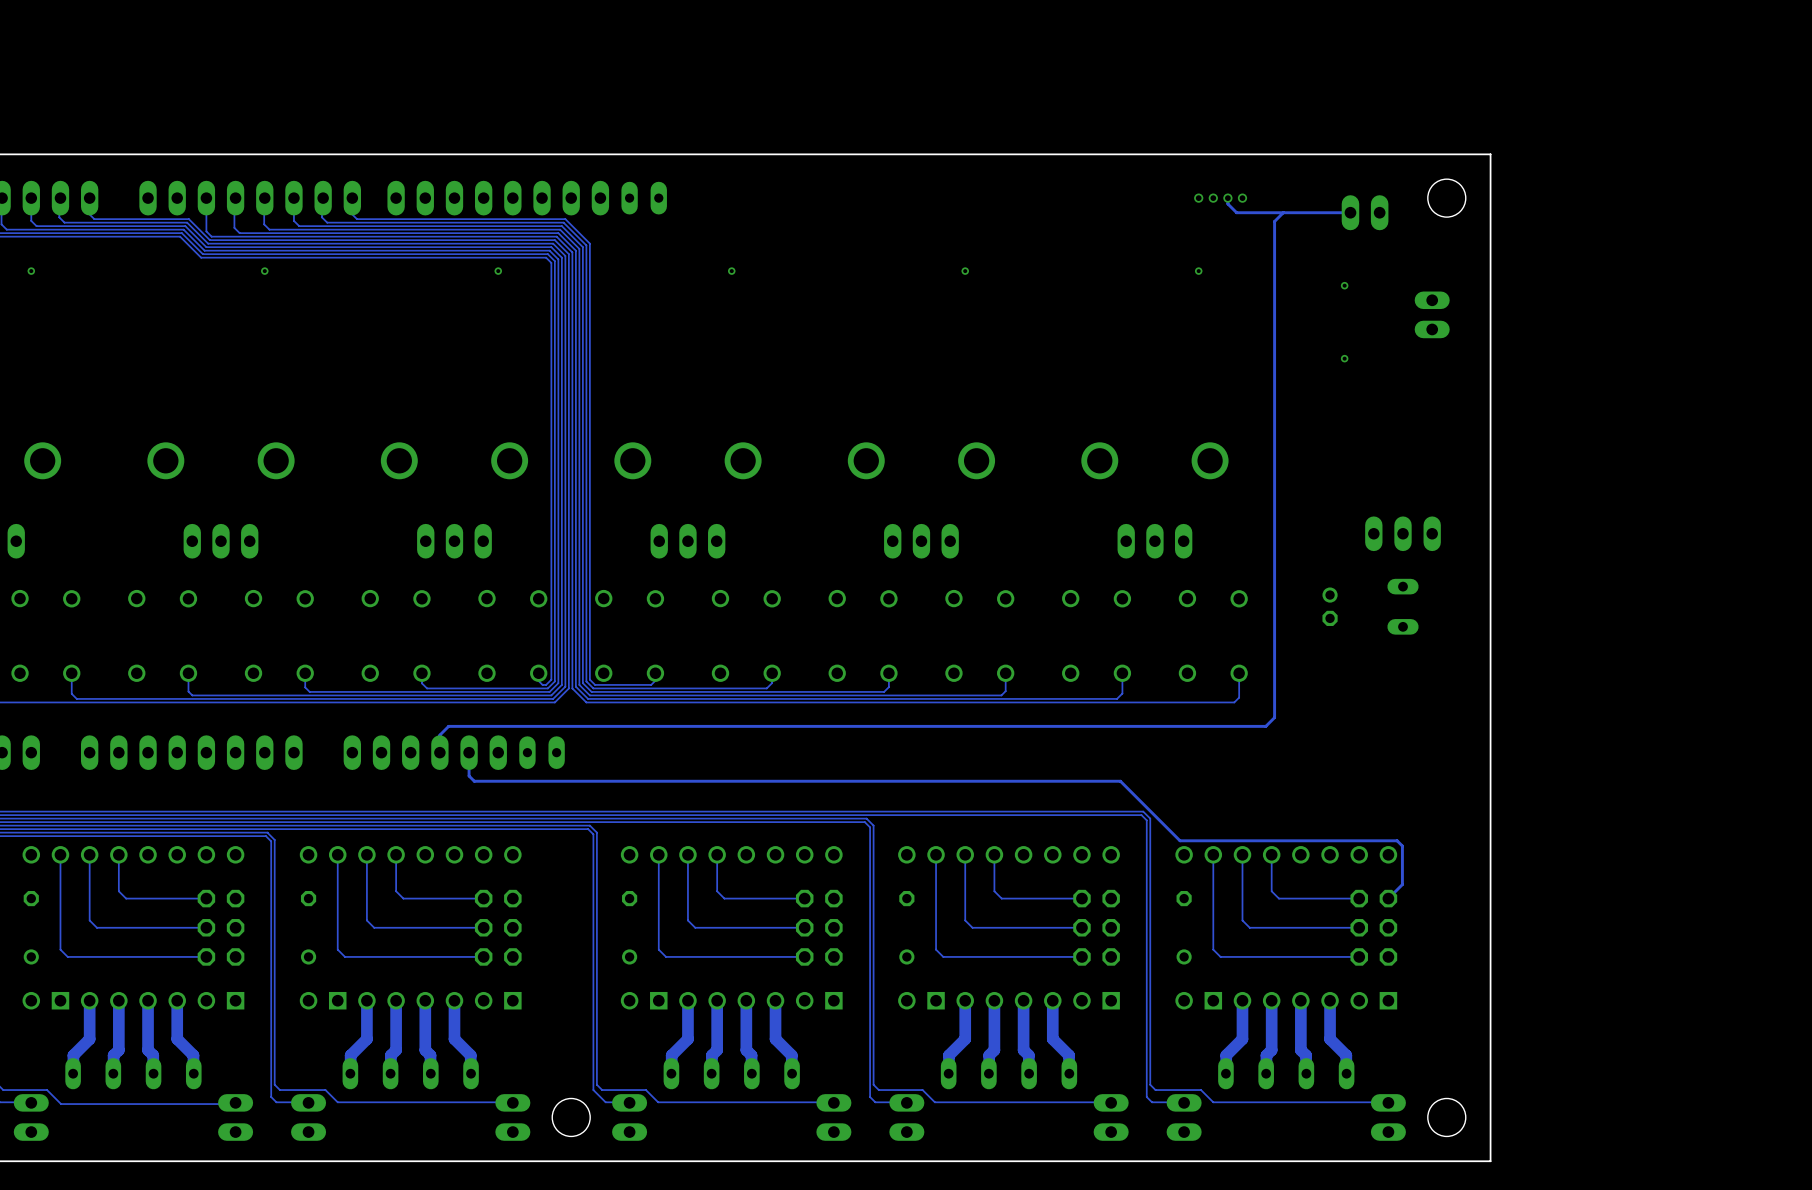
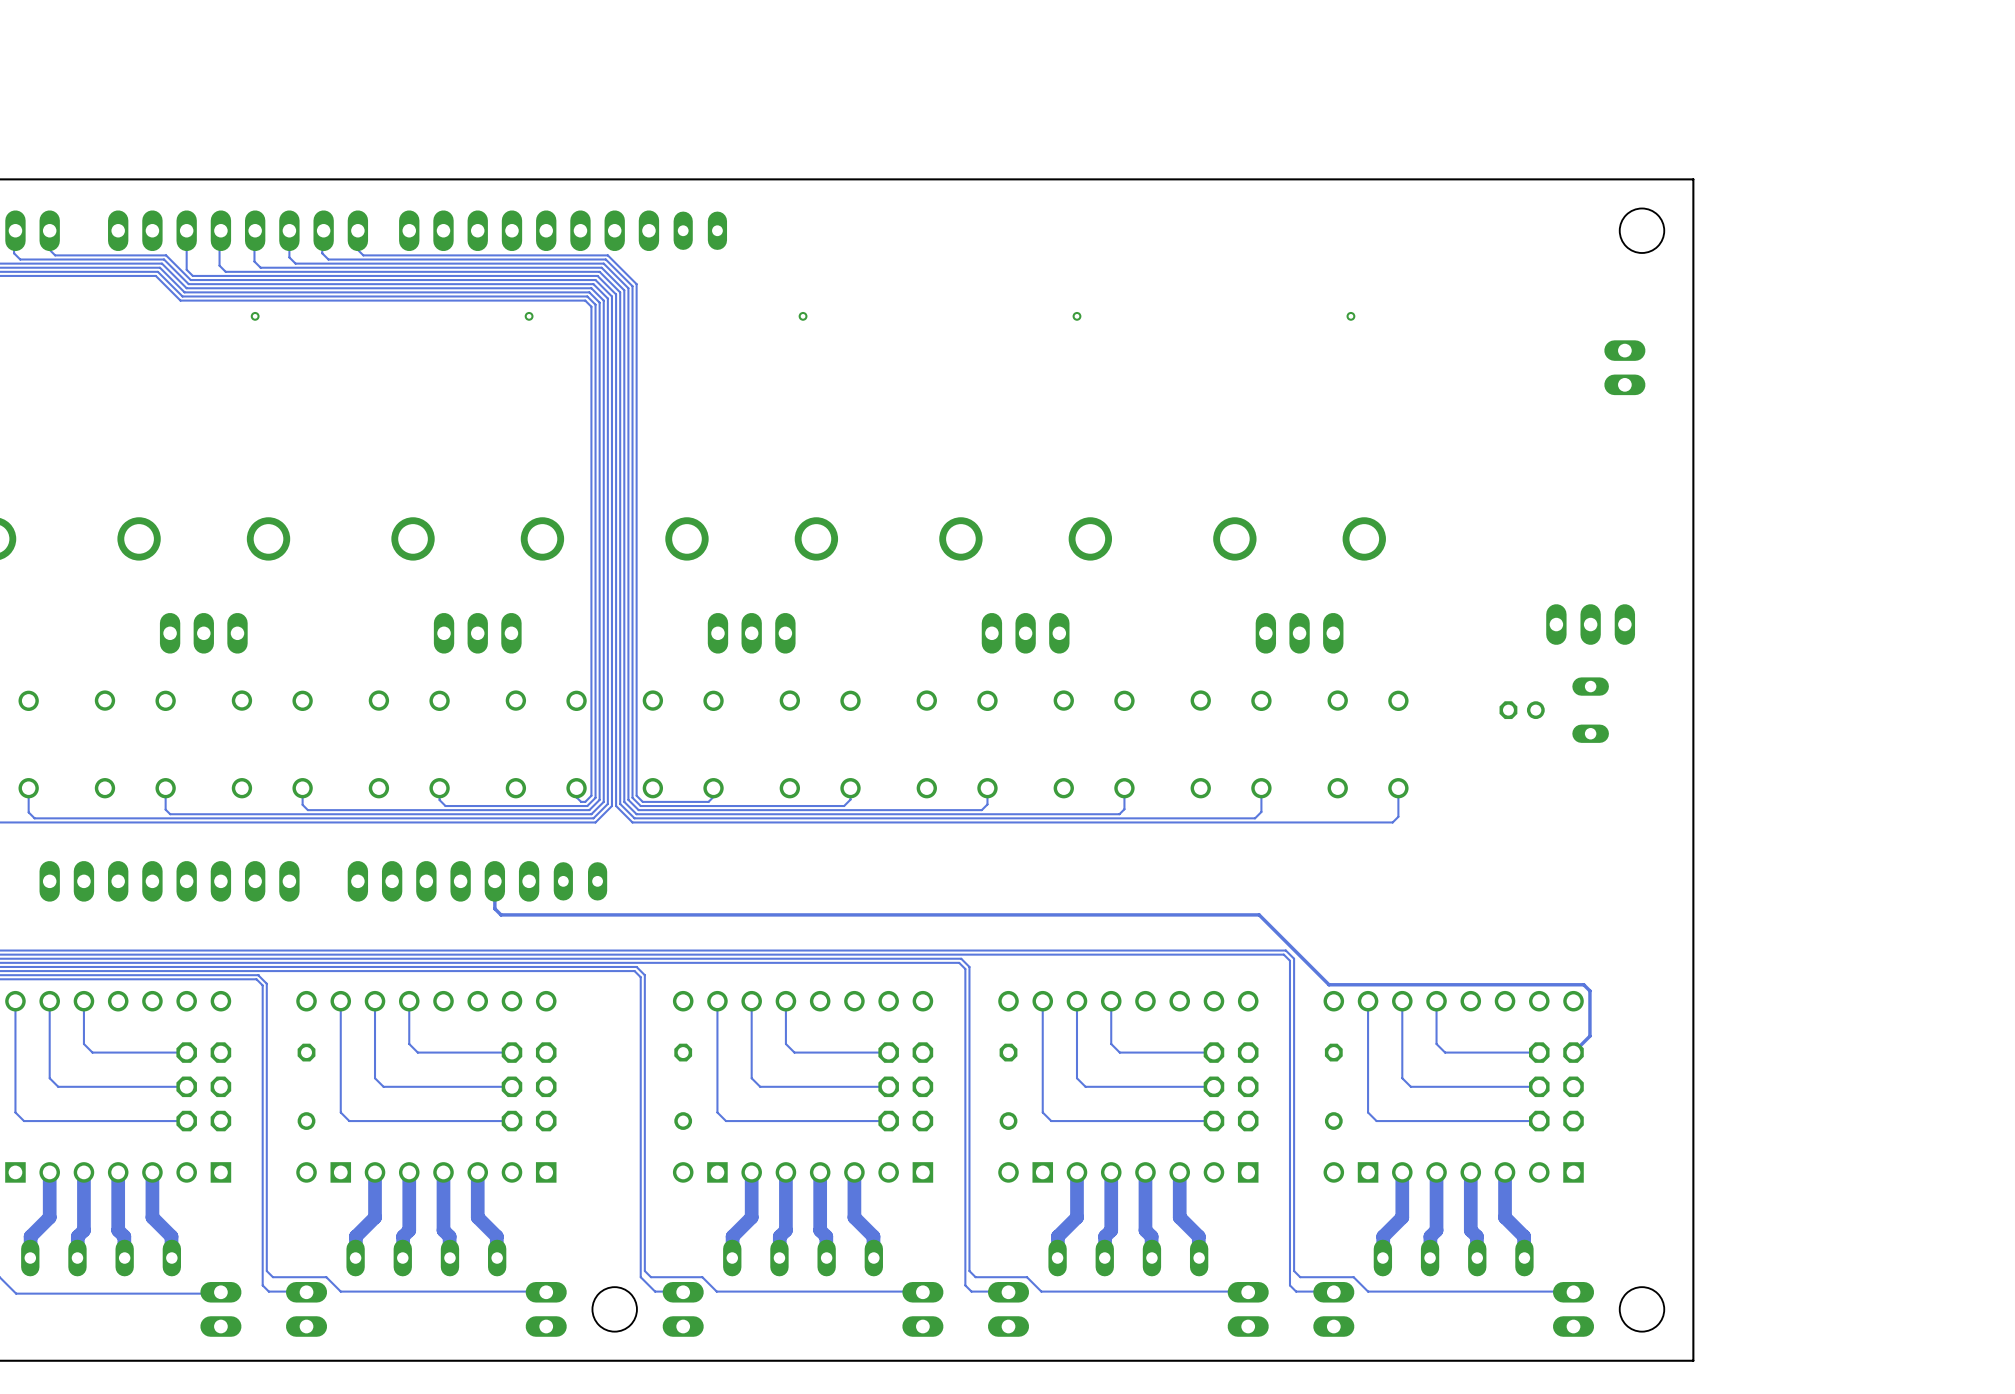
via: (1198, 198) -> none
via: (1213, 198) -> none
track: (1227, 198) (1227, 203) (1236, 212) (1350, 212) -> none
via: (1227, 198) -> none
via: (1242, 198) -> none
track: (1283, 212) (1274, 221) (1274, 717) (1265, 726) (448, 726) (439, 735) (439, 752) -> none
part: (1365, 212) -> none
via: (1344, 285) -> none
via: (1344, 358) -> none
part rotation: 0° (1330, 606) -> 90° clockwise (1522, 710)

